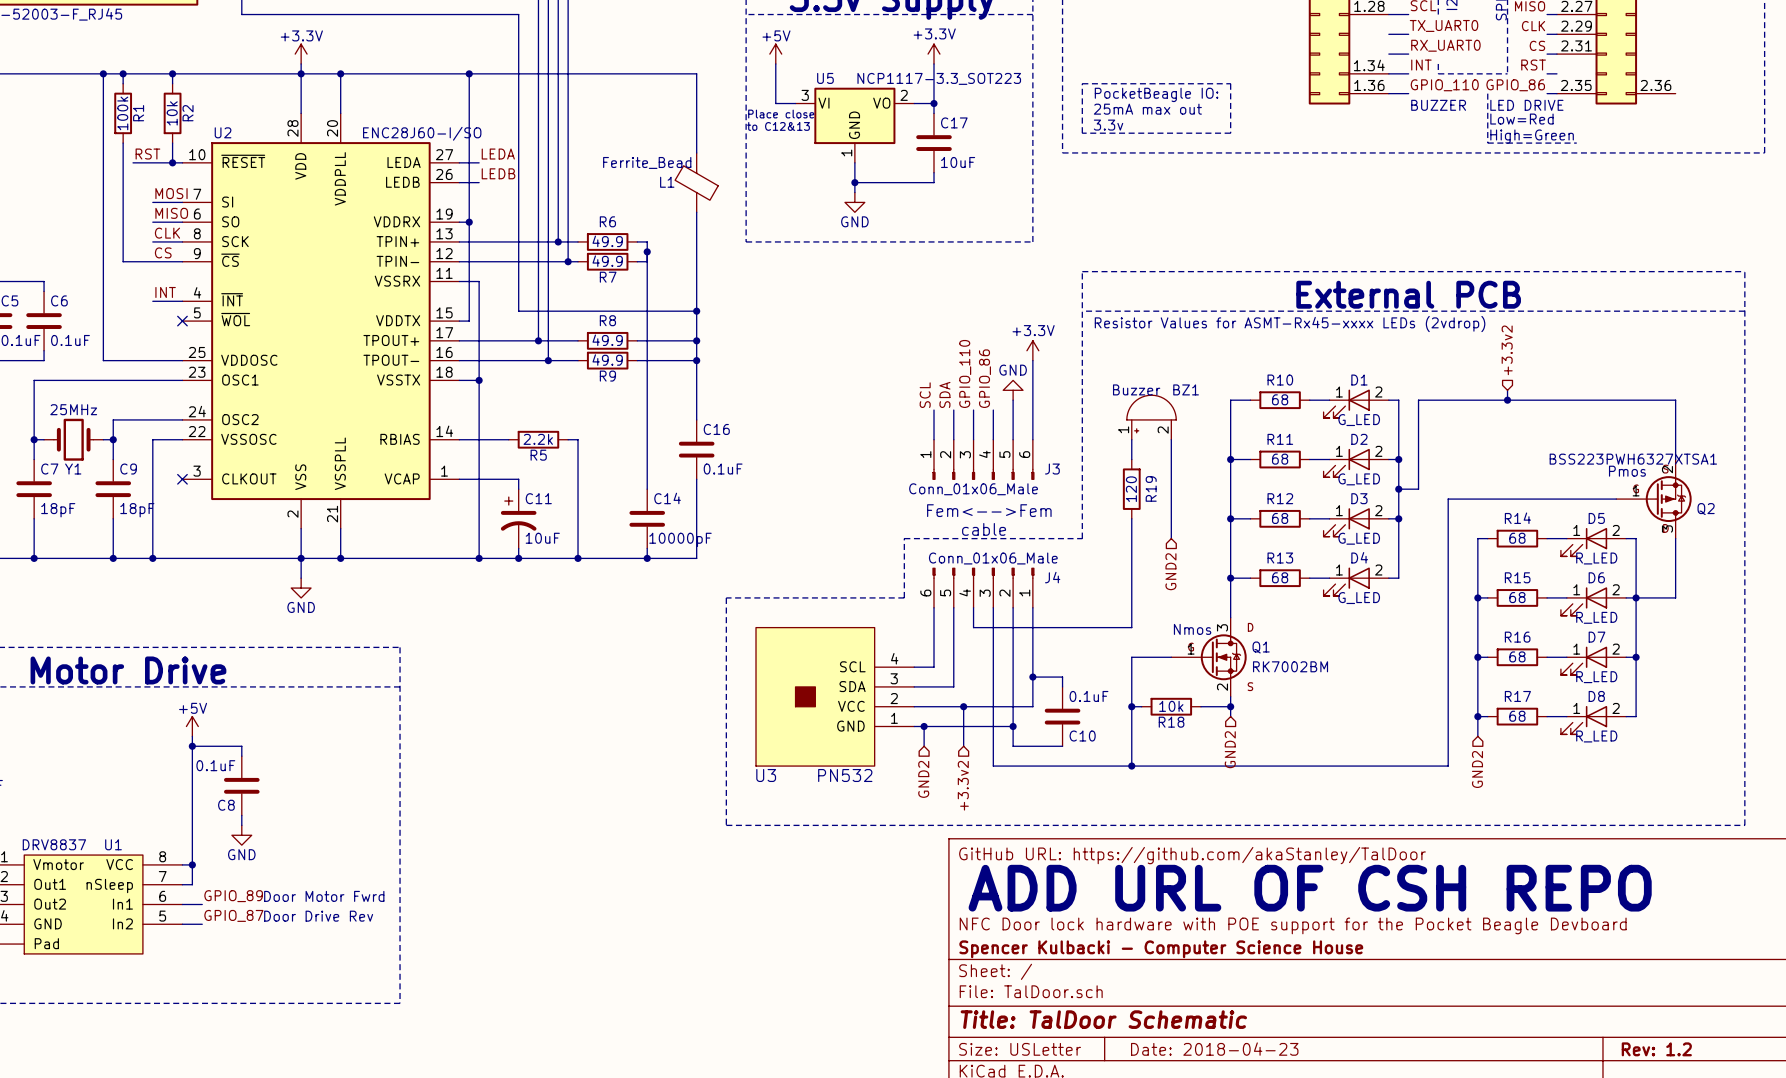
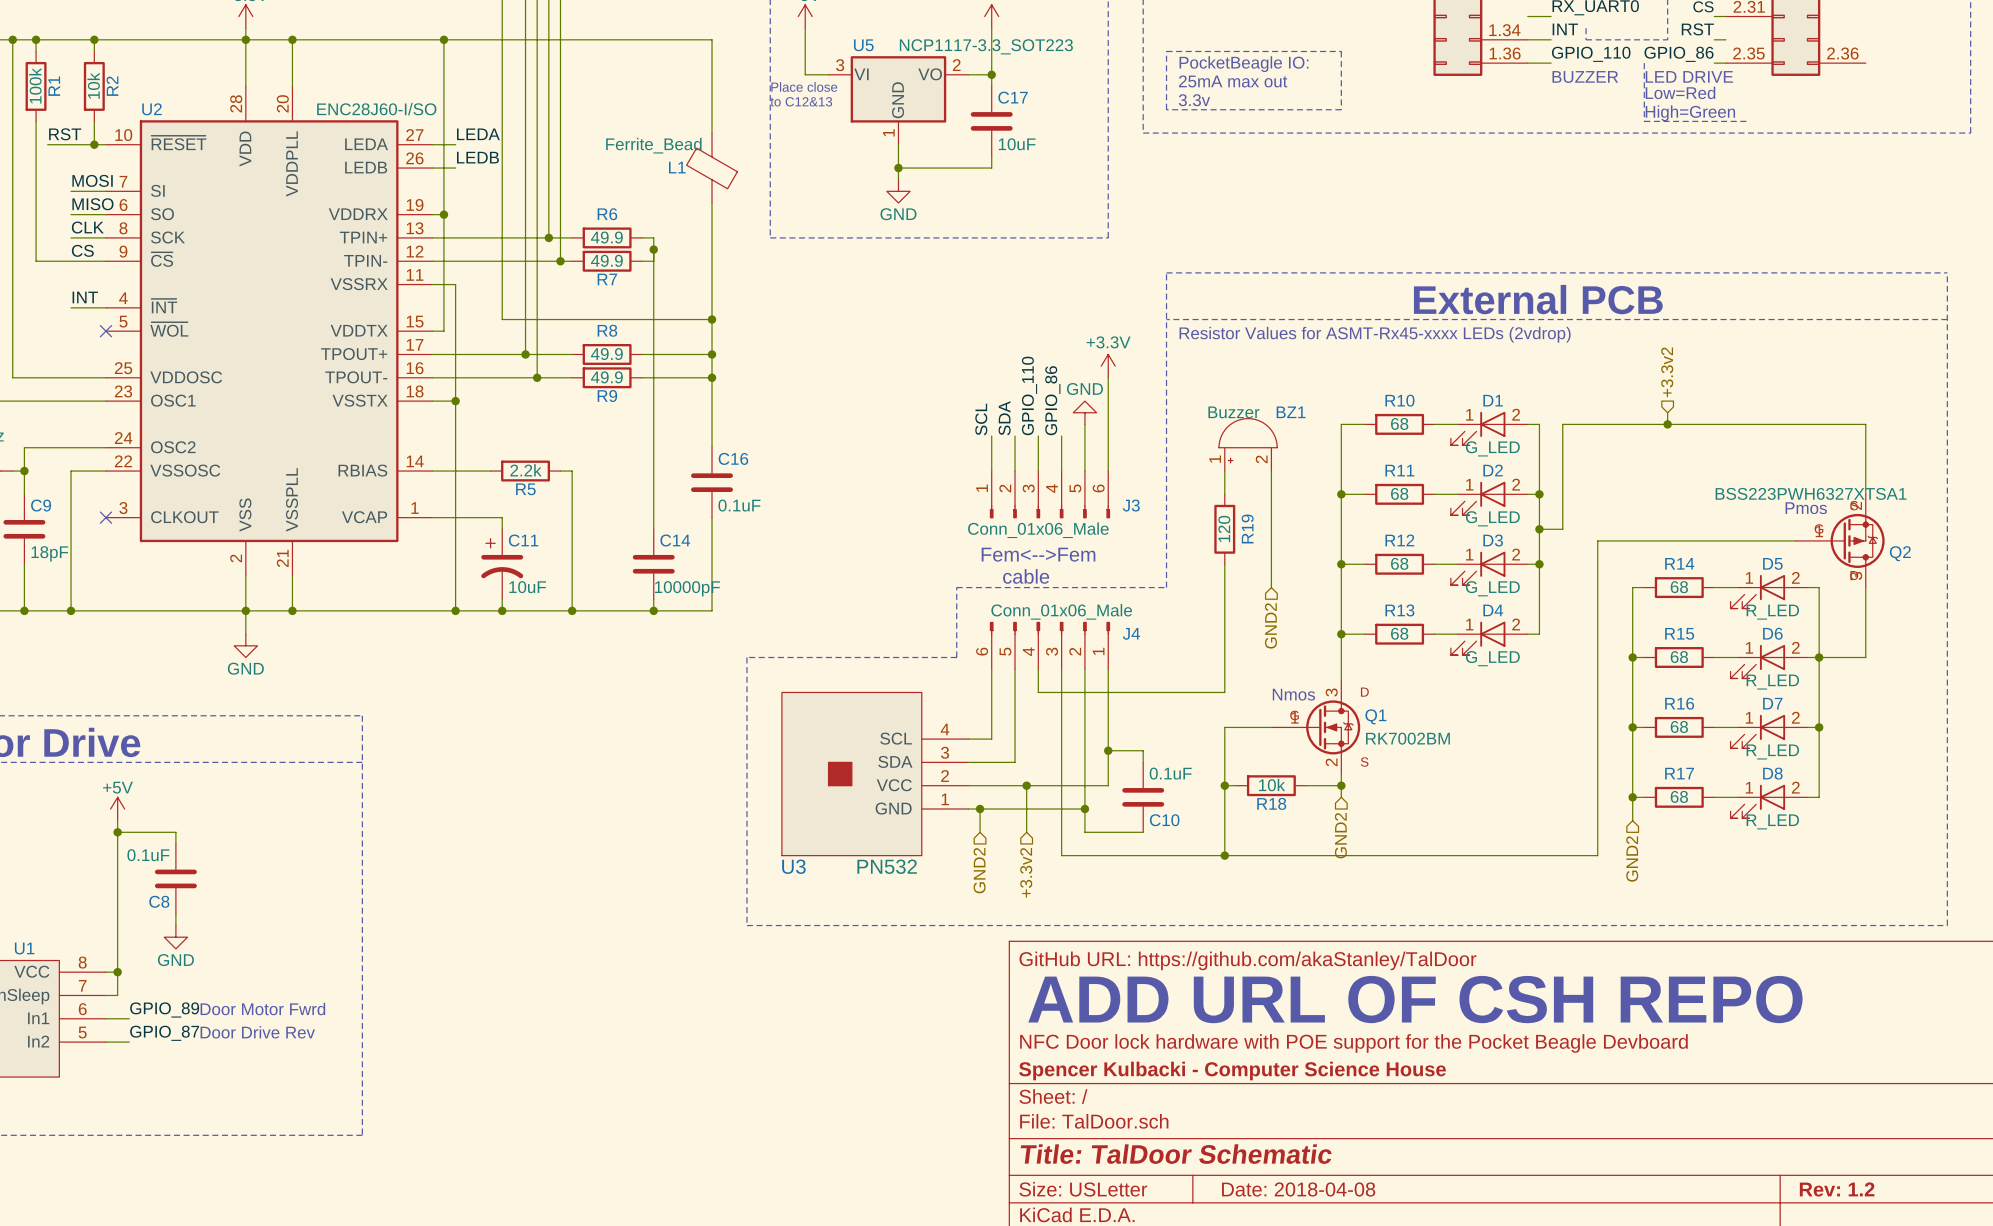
title block: Date: 2018-04-23 (1214, 1049) -> Date: 2018-04-08 (1298, 1189)

